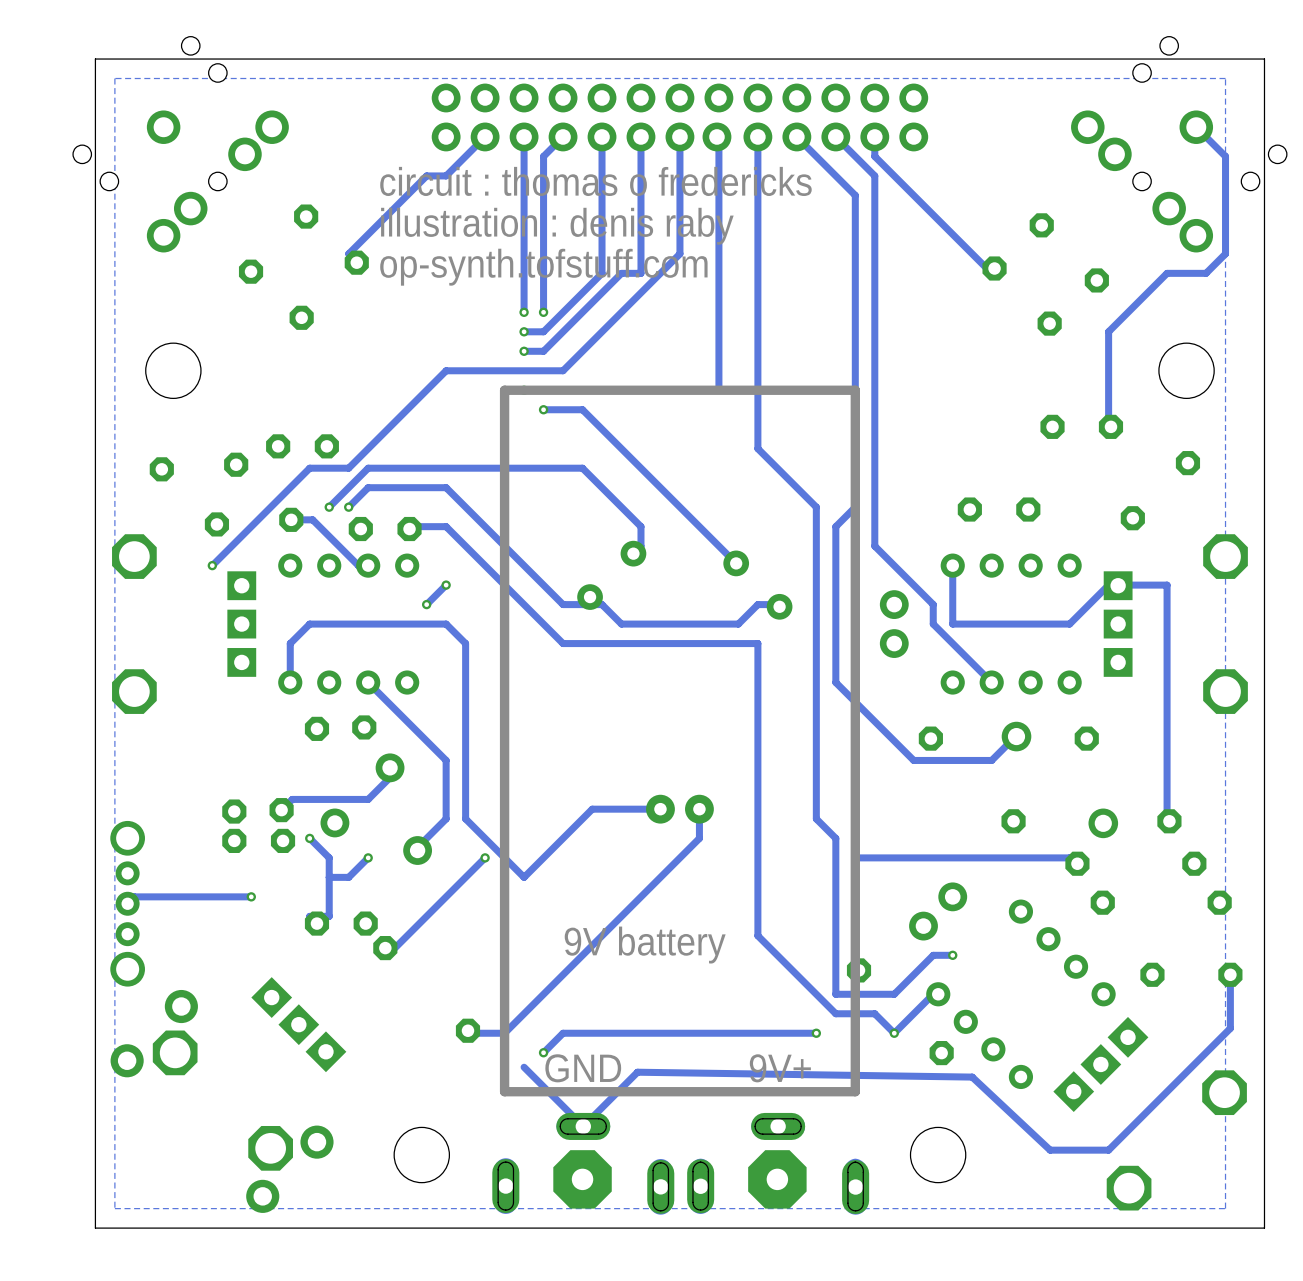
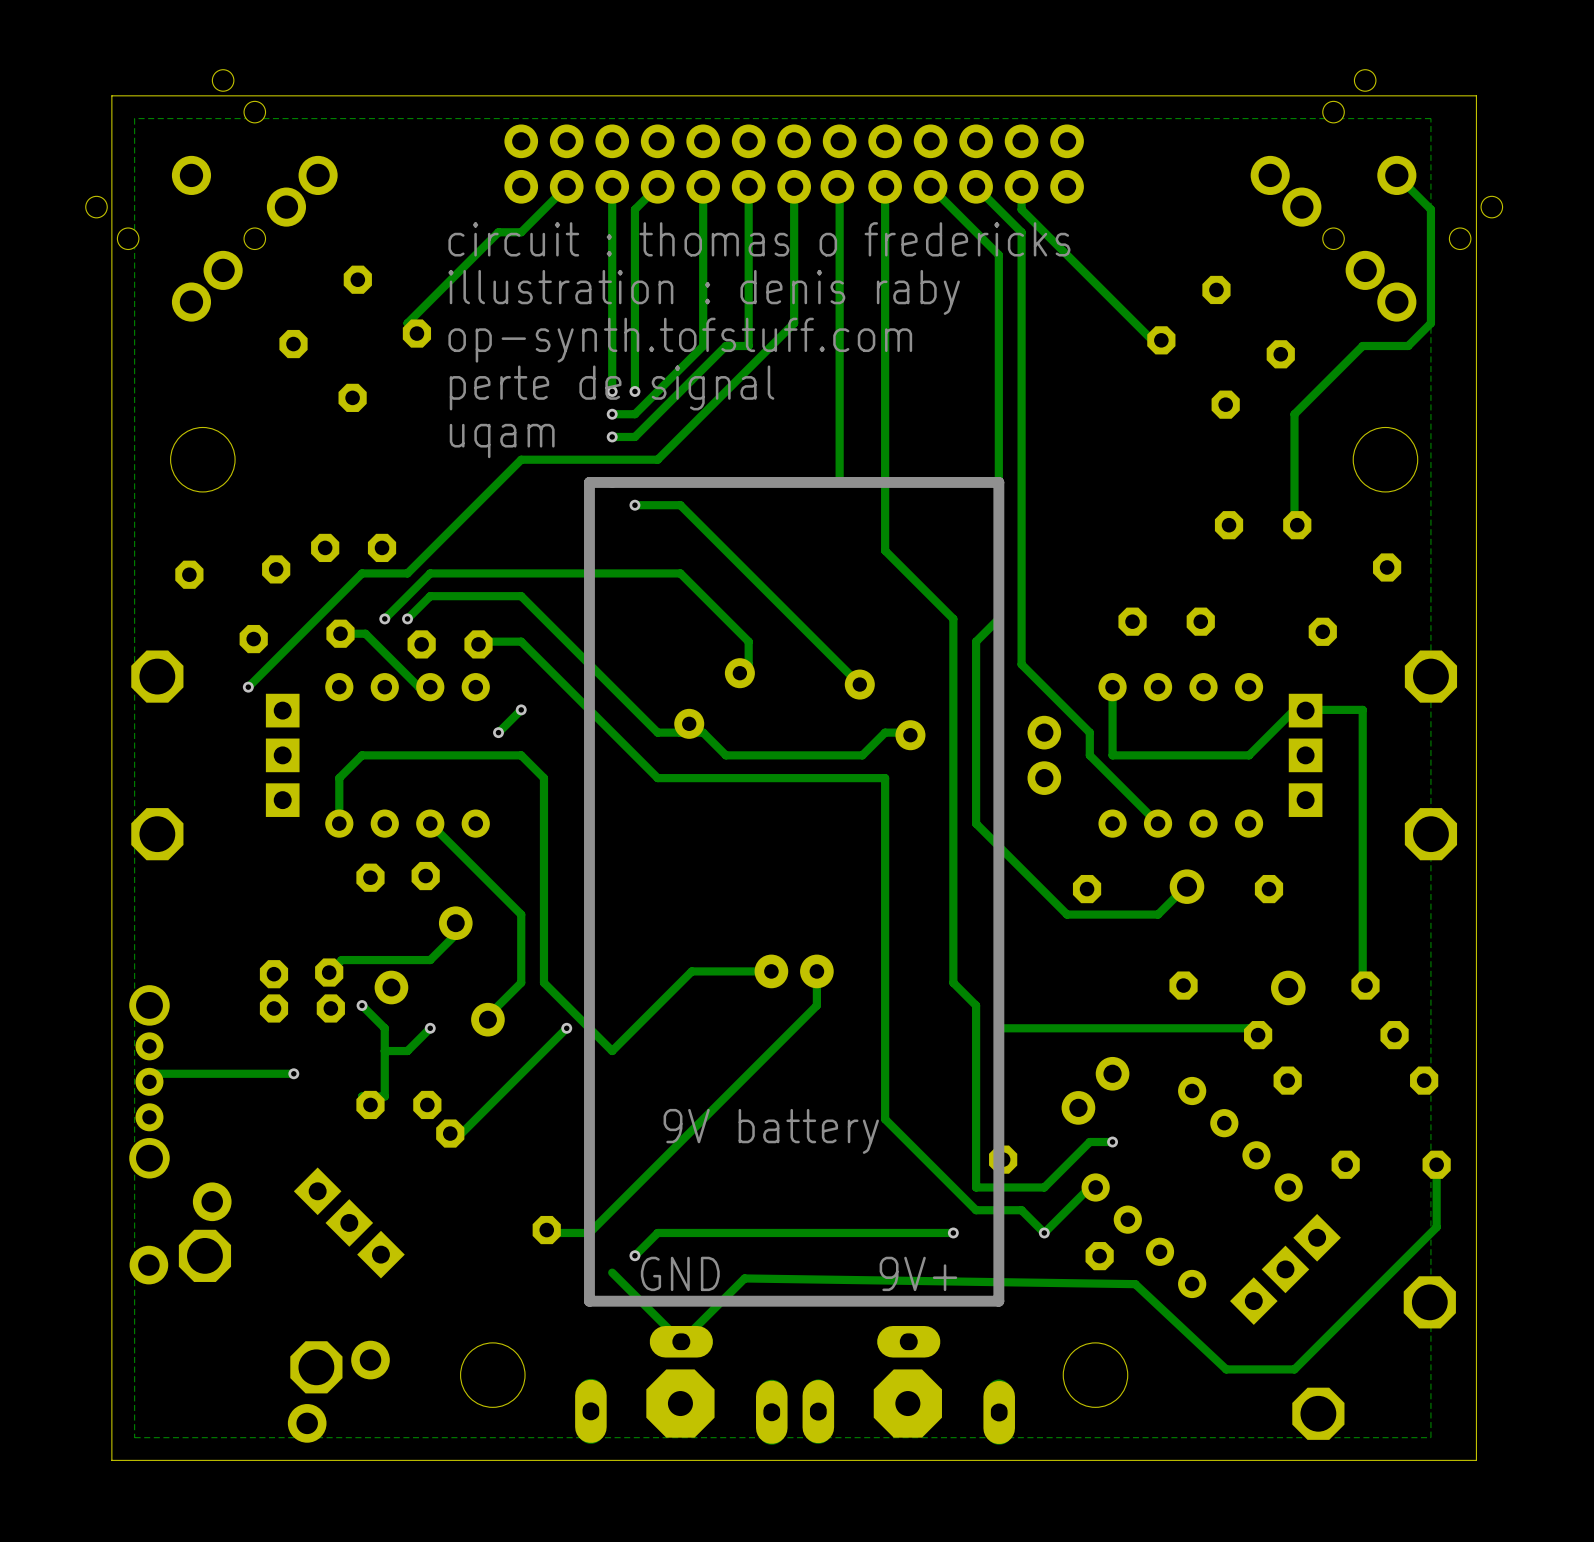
text: none -> perte de signal (612, 387)
text: none -> uqam (502, 440)

